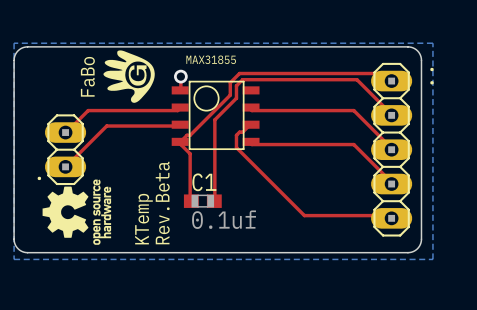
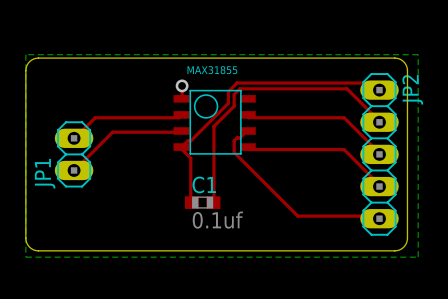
drawing: [103, 50, 155, 103] -> none
JP2 name: .. (432, 76) -> JP2 (412, 89)
JP1 name: . (39, 178) -> JP1 (45, 173)
drawing: [42, 179, 112, 245] -> none
text: Rev.Beta (162, 203) -> none
text: KTemp (143, 219) -> none

